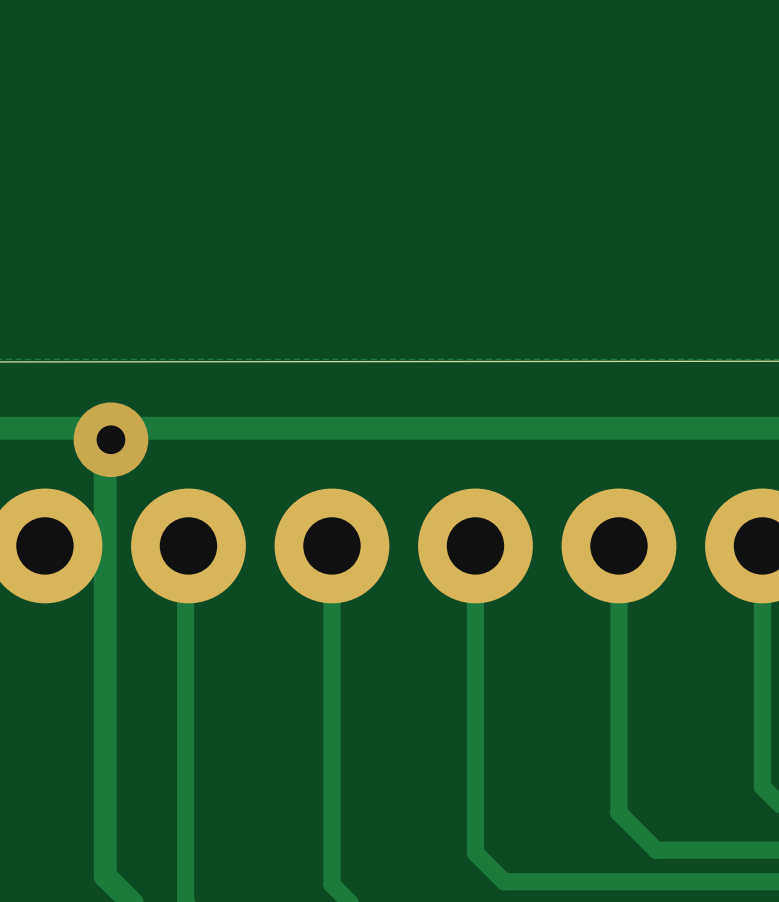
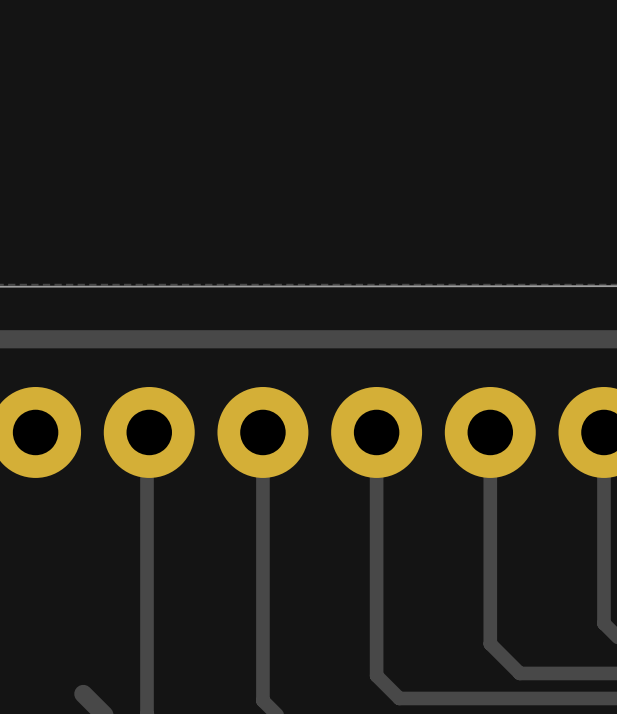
track: (110, 439) (105, 439) (105, 876) -> none
via: (110, 439) -> none

